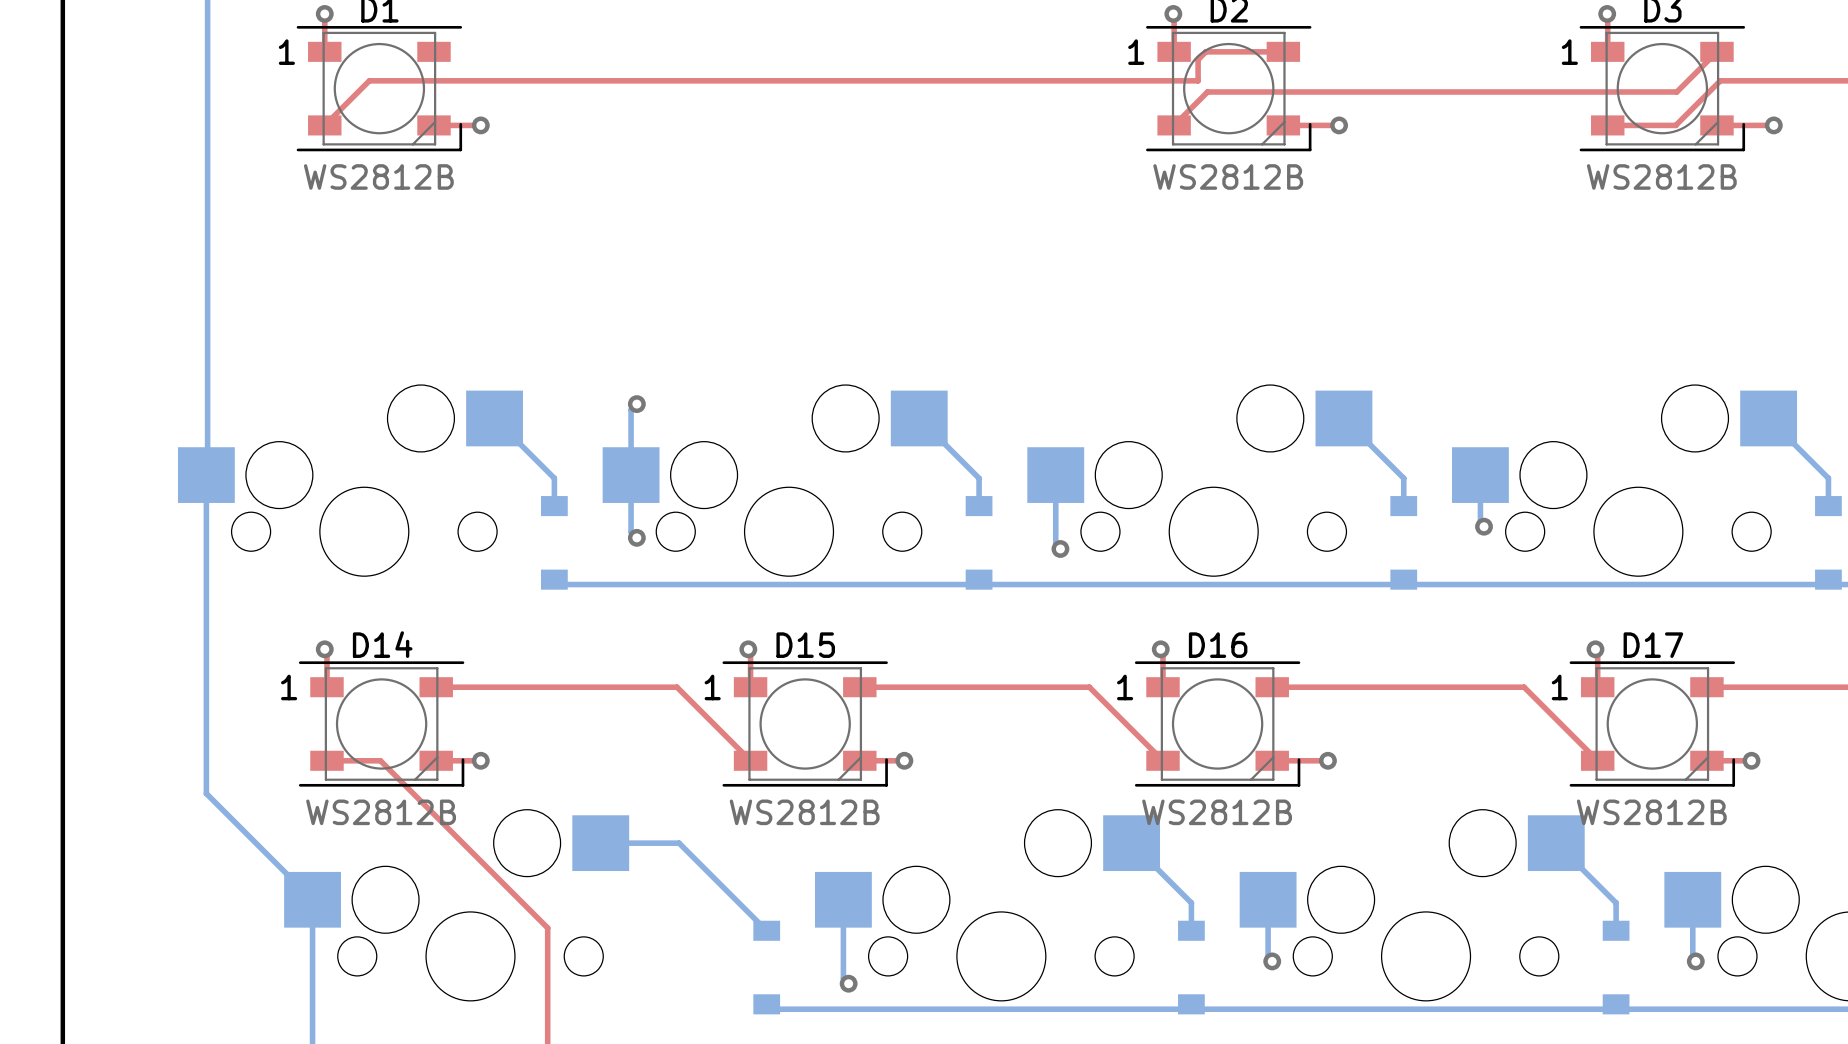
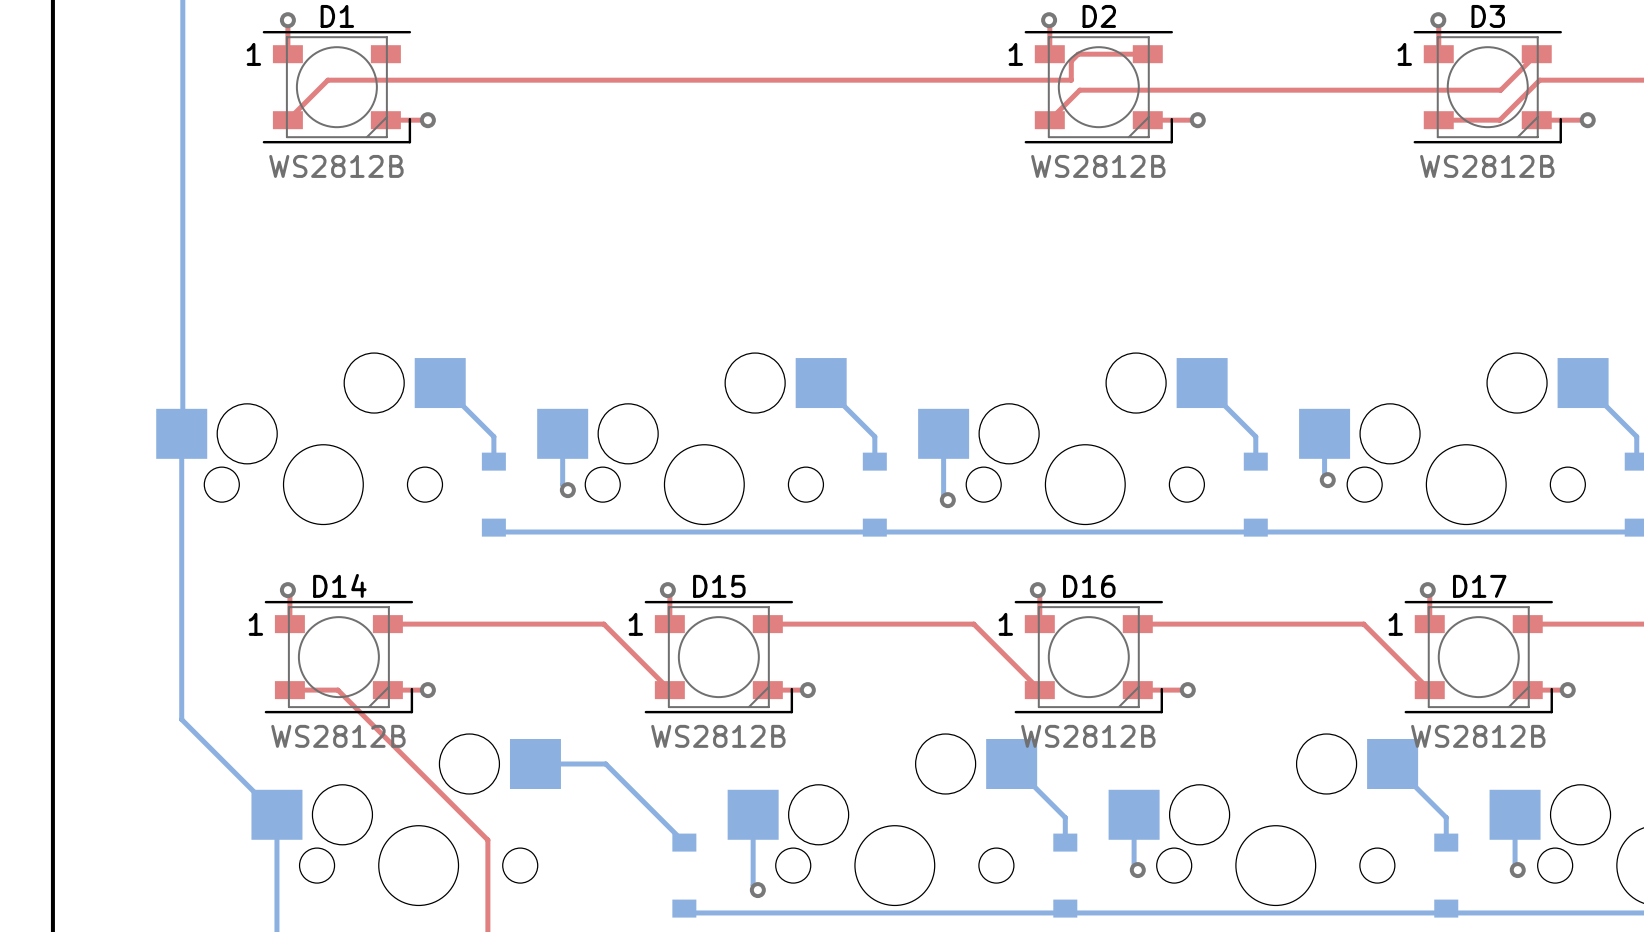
bottom track: (636, 404) (631, 409) (631, 475) -> none
via: (636, 404) -> none

